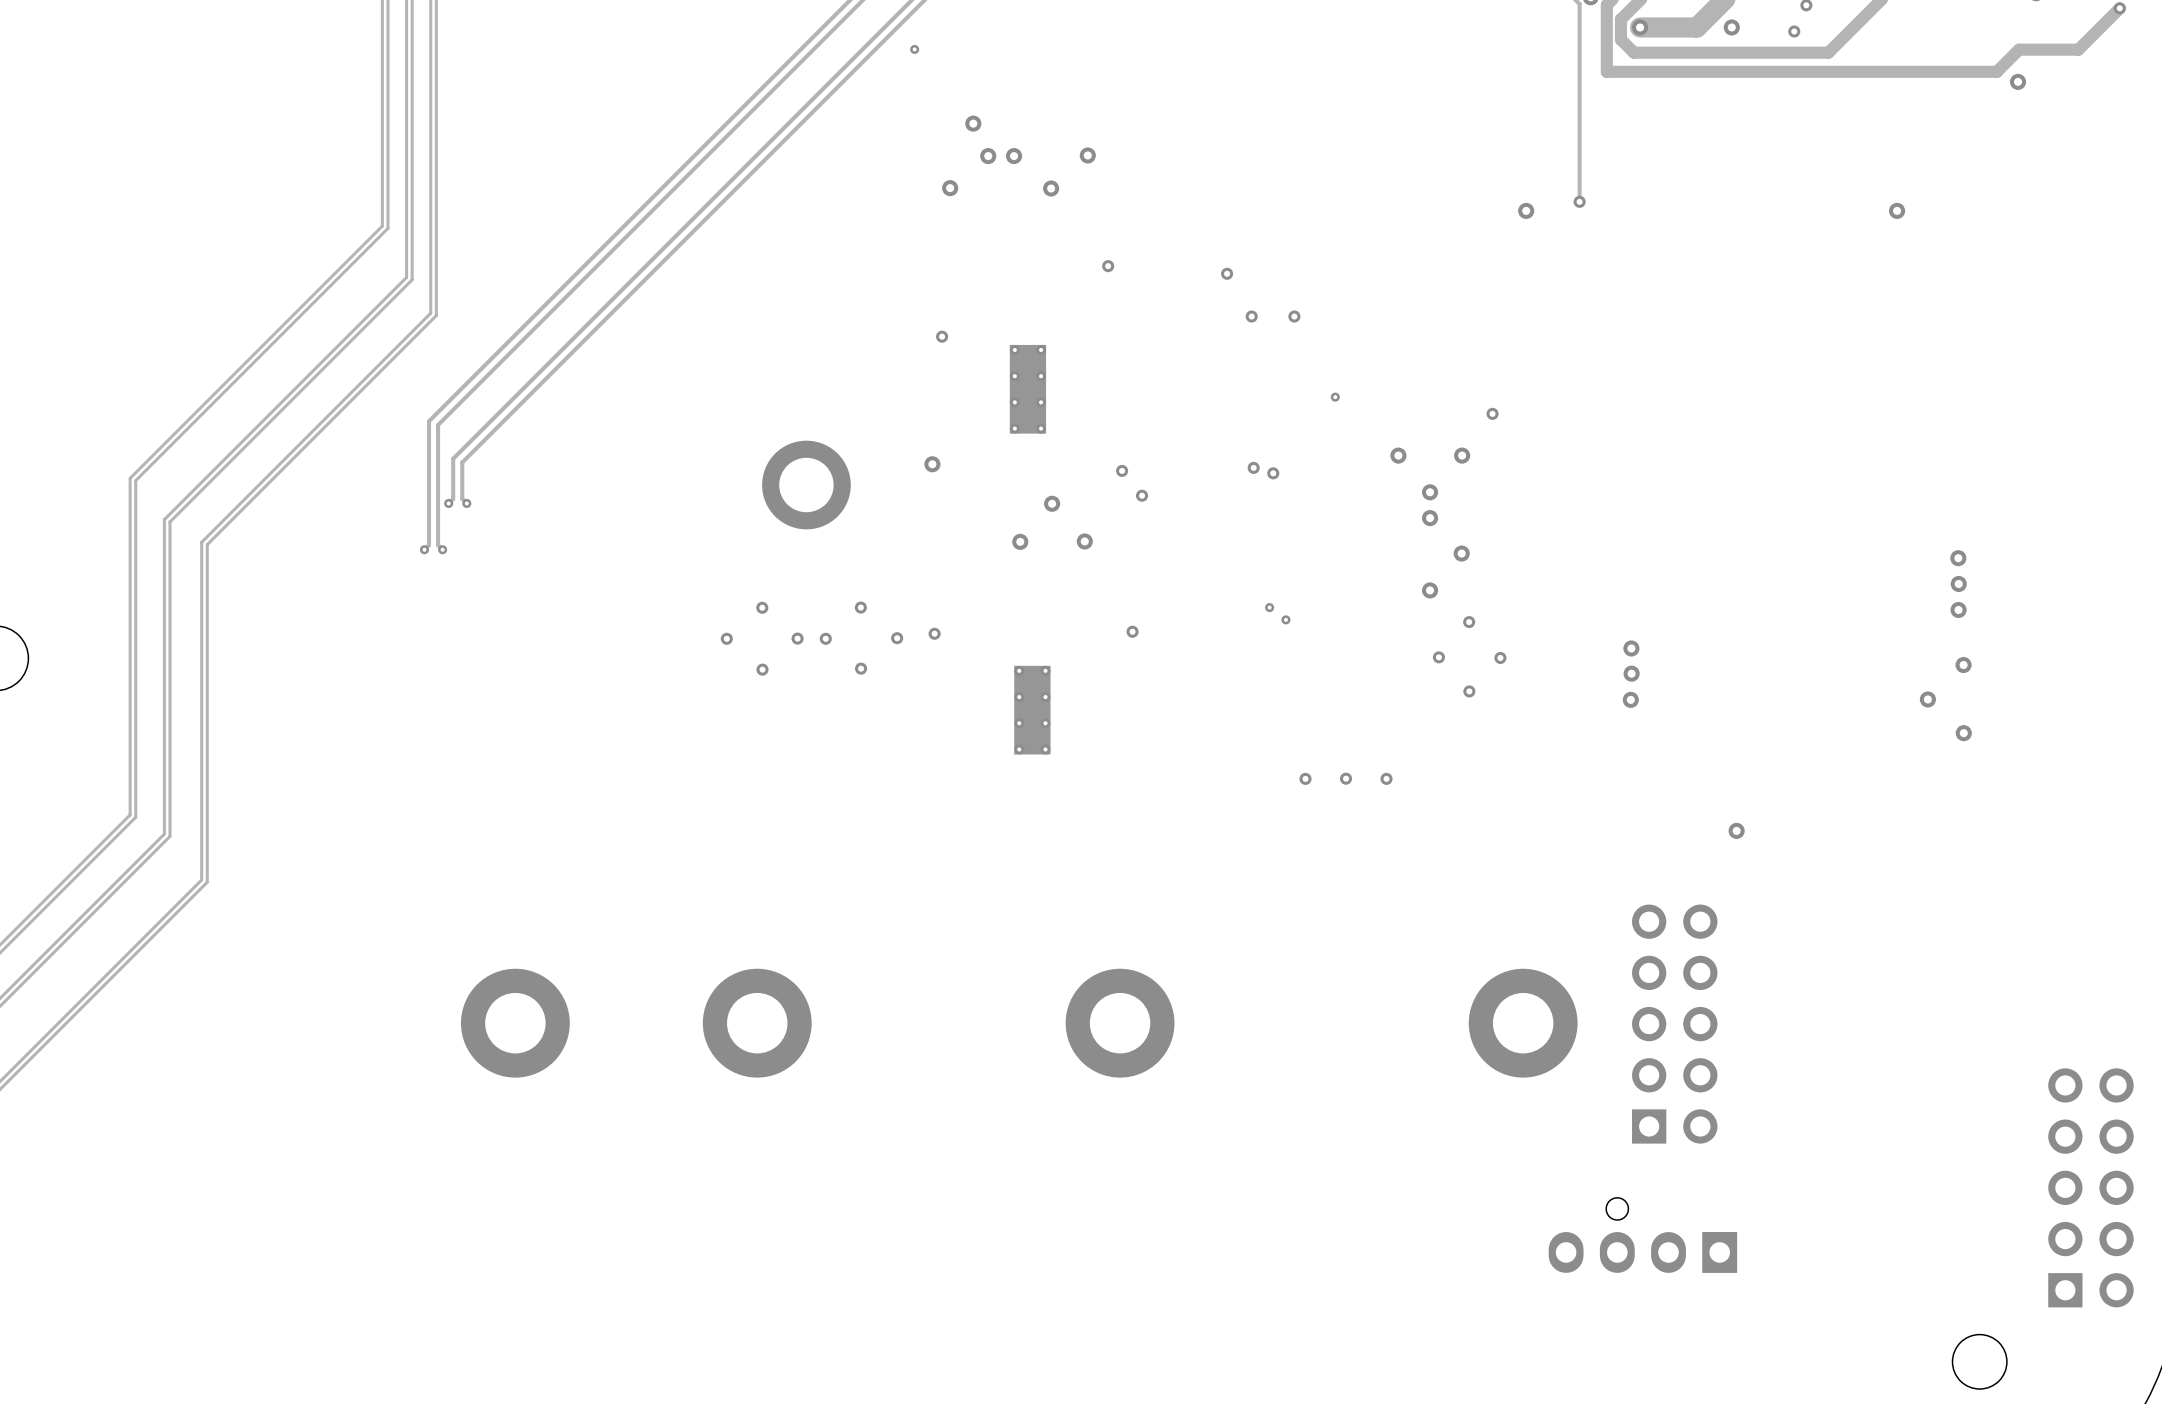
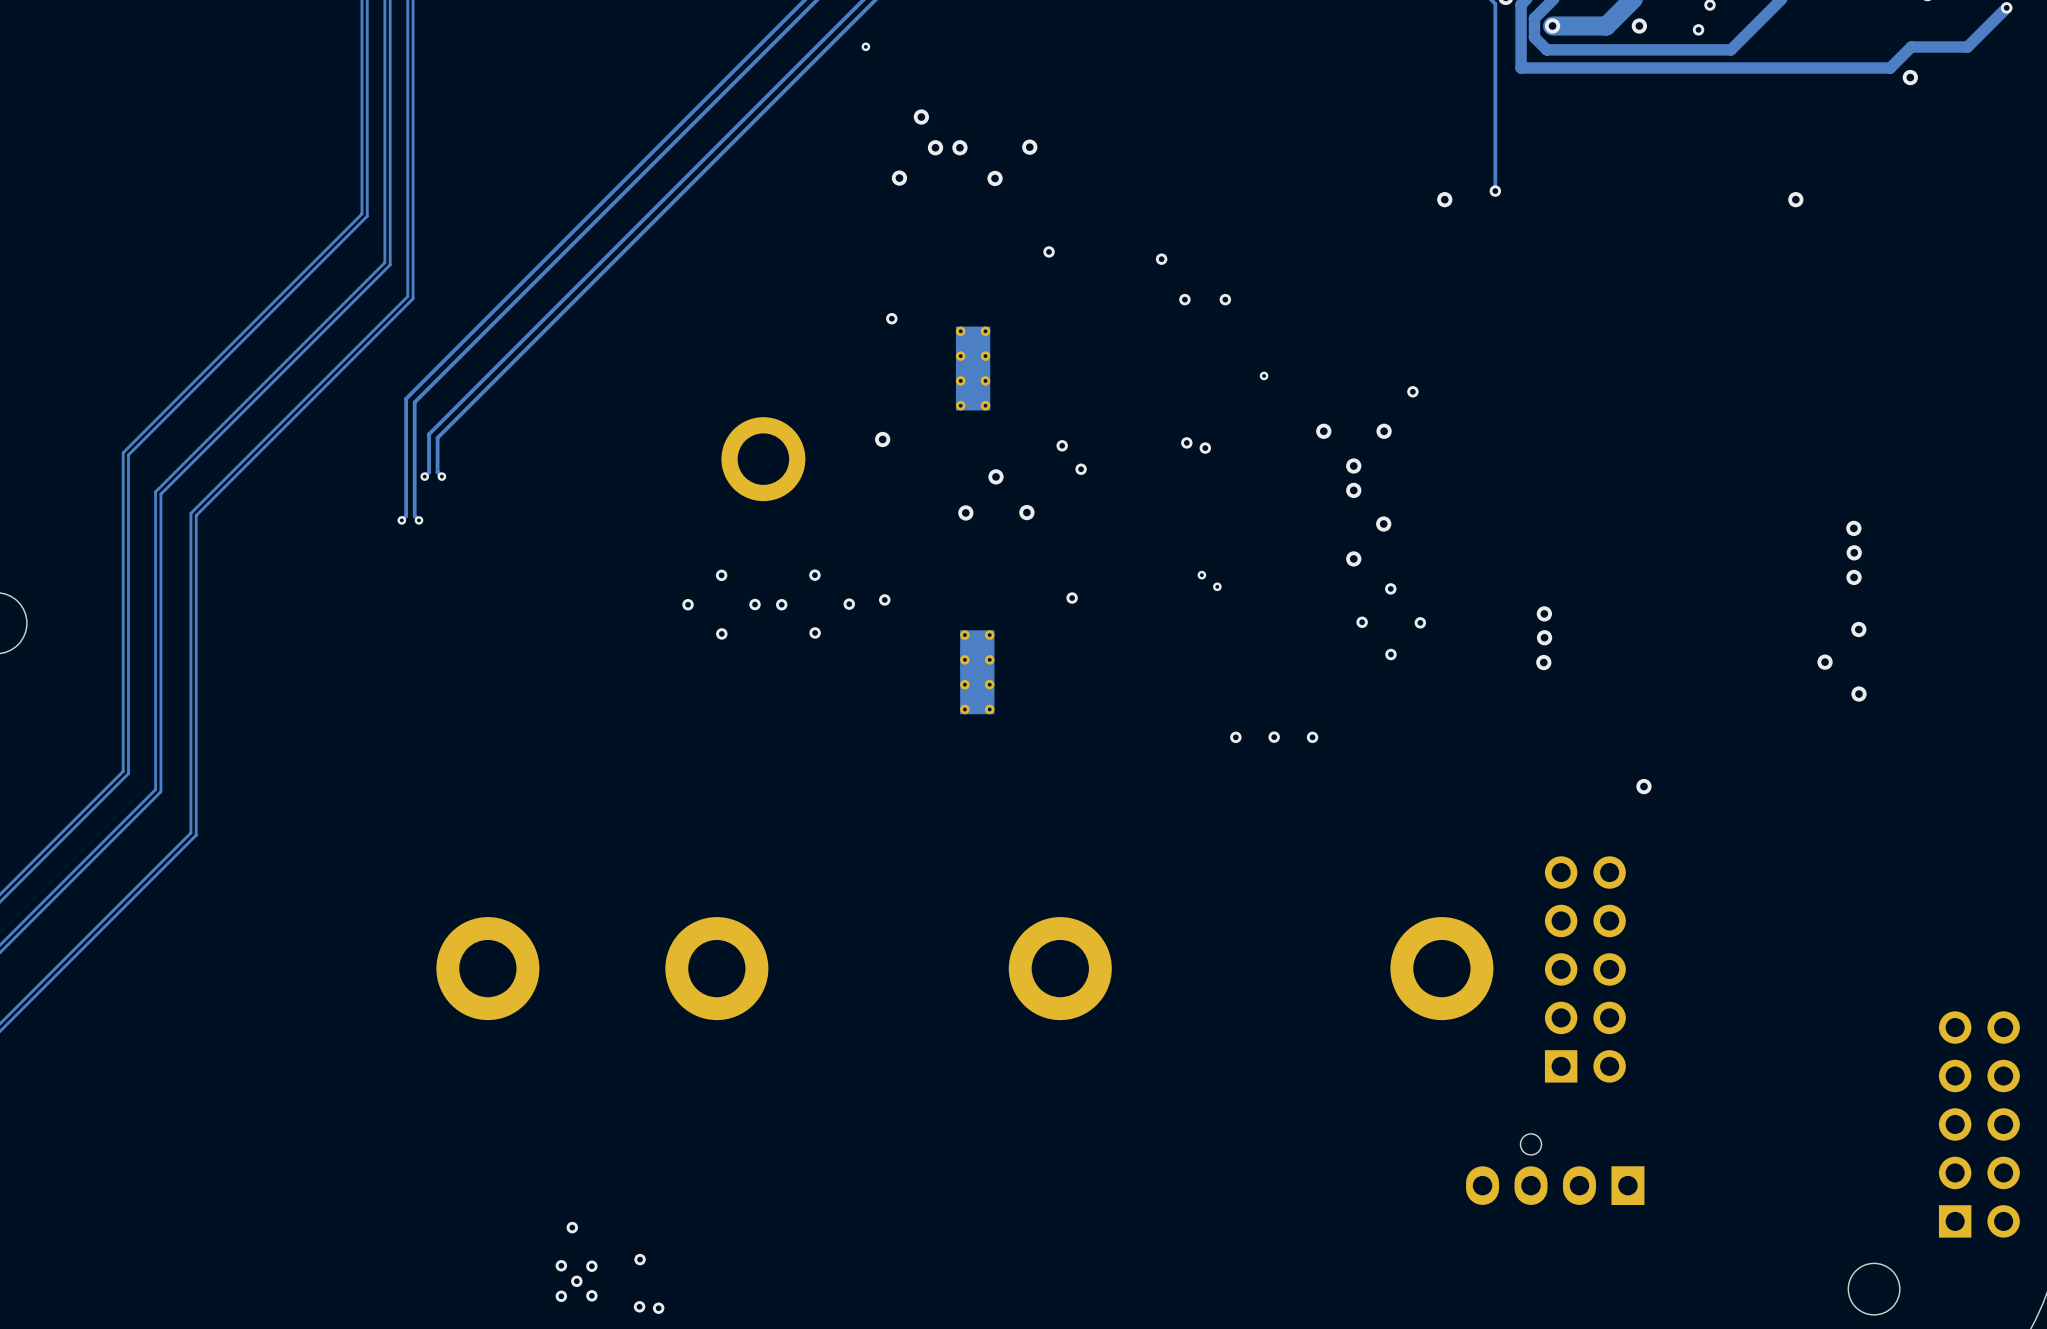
via: none -> (572, 1227)
via: none -> (640, 1259)
via: none -> (561, 1265)
via: none -> (591, 1266)
via: none -> (576, 1281)
via: none -> (591, 1295)
via: none -> (561, 1296)
via: none -> (639, 1306)
via: none -> (658, 1308)

